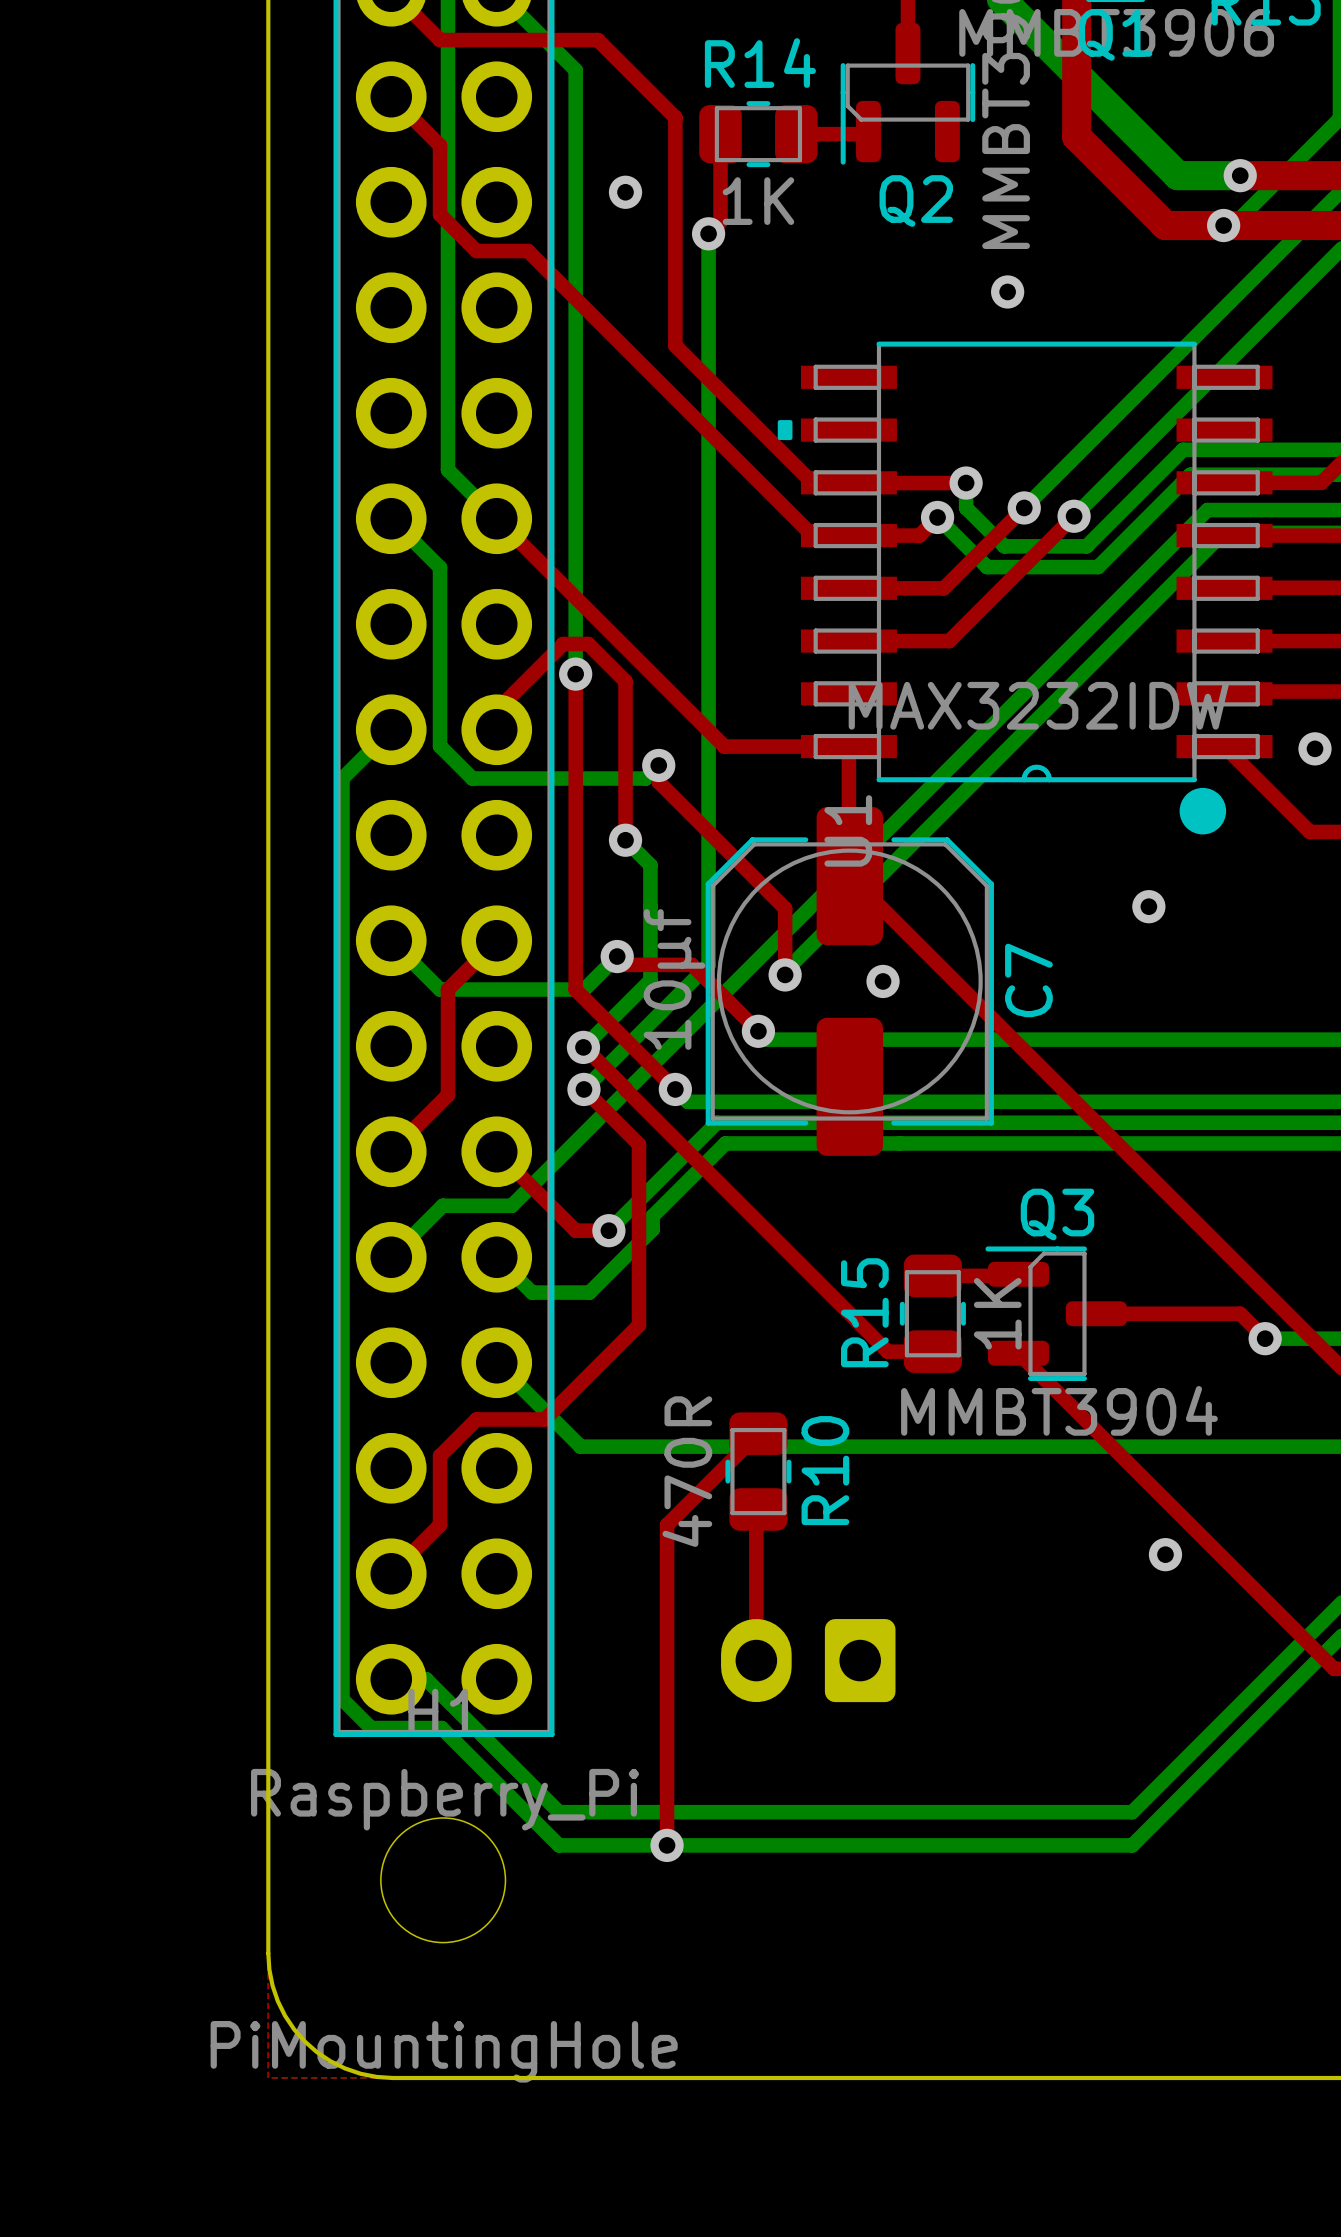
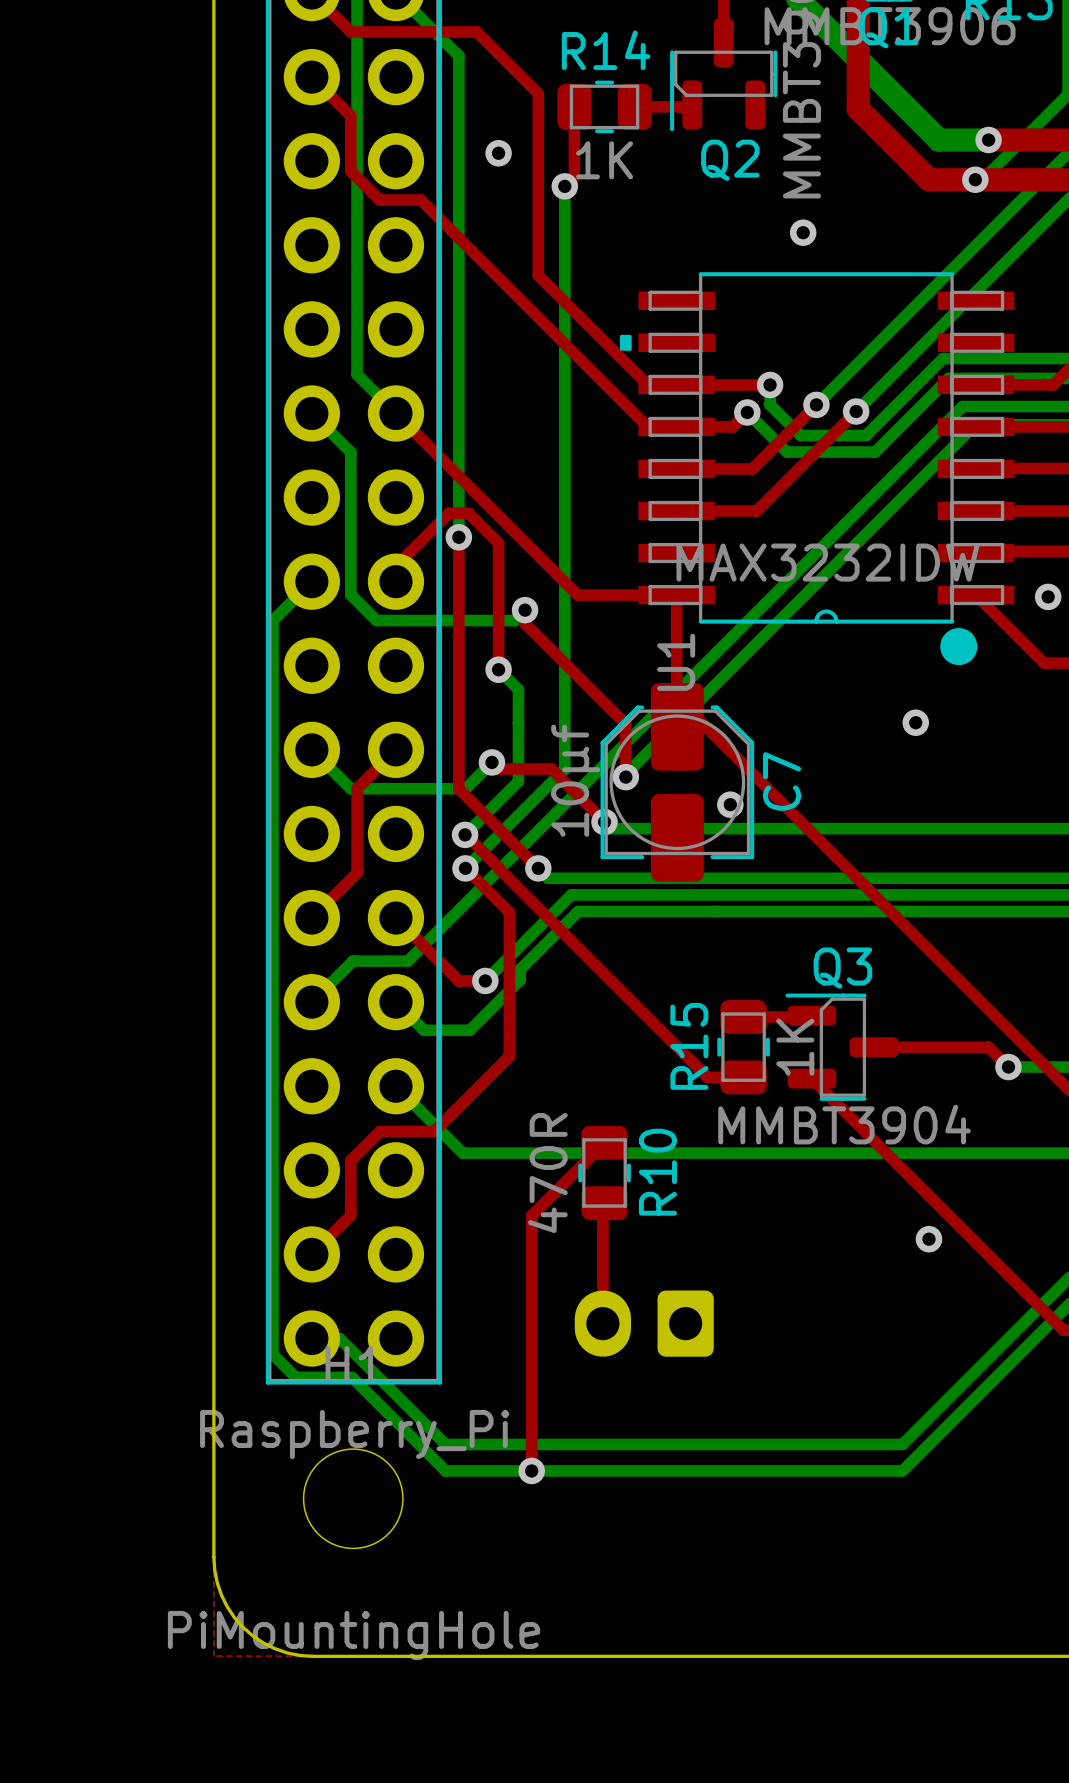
C7 footprint: [705, 807, 994, 1156] -> [600, 682, 755, 882]
via position: (883, 981) -> (730, 804)

